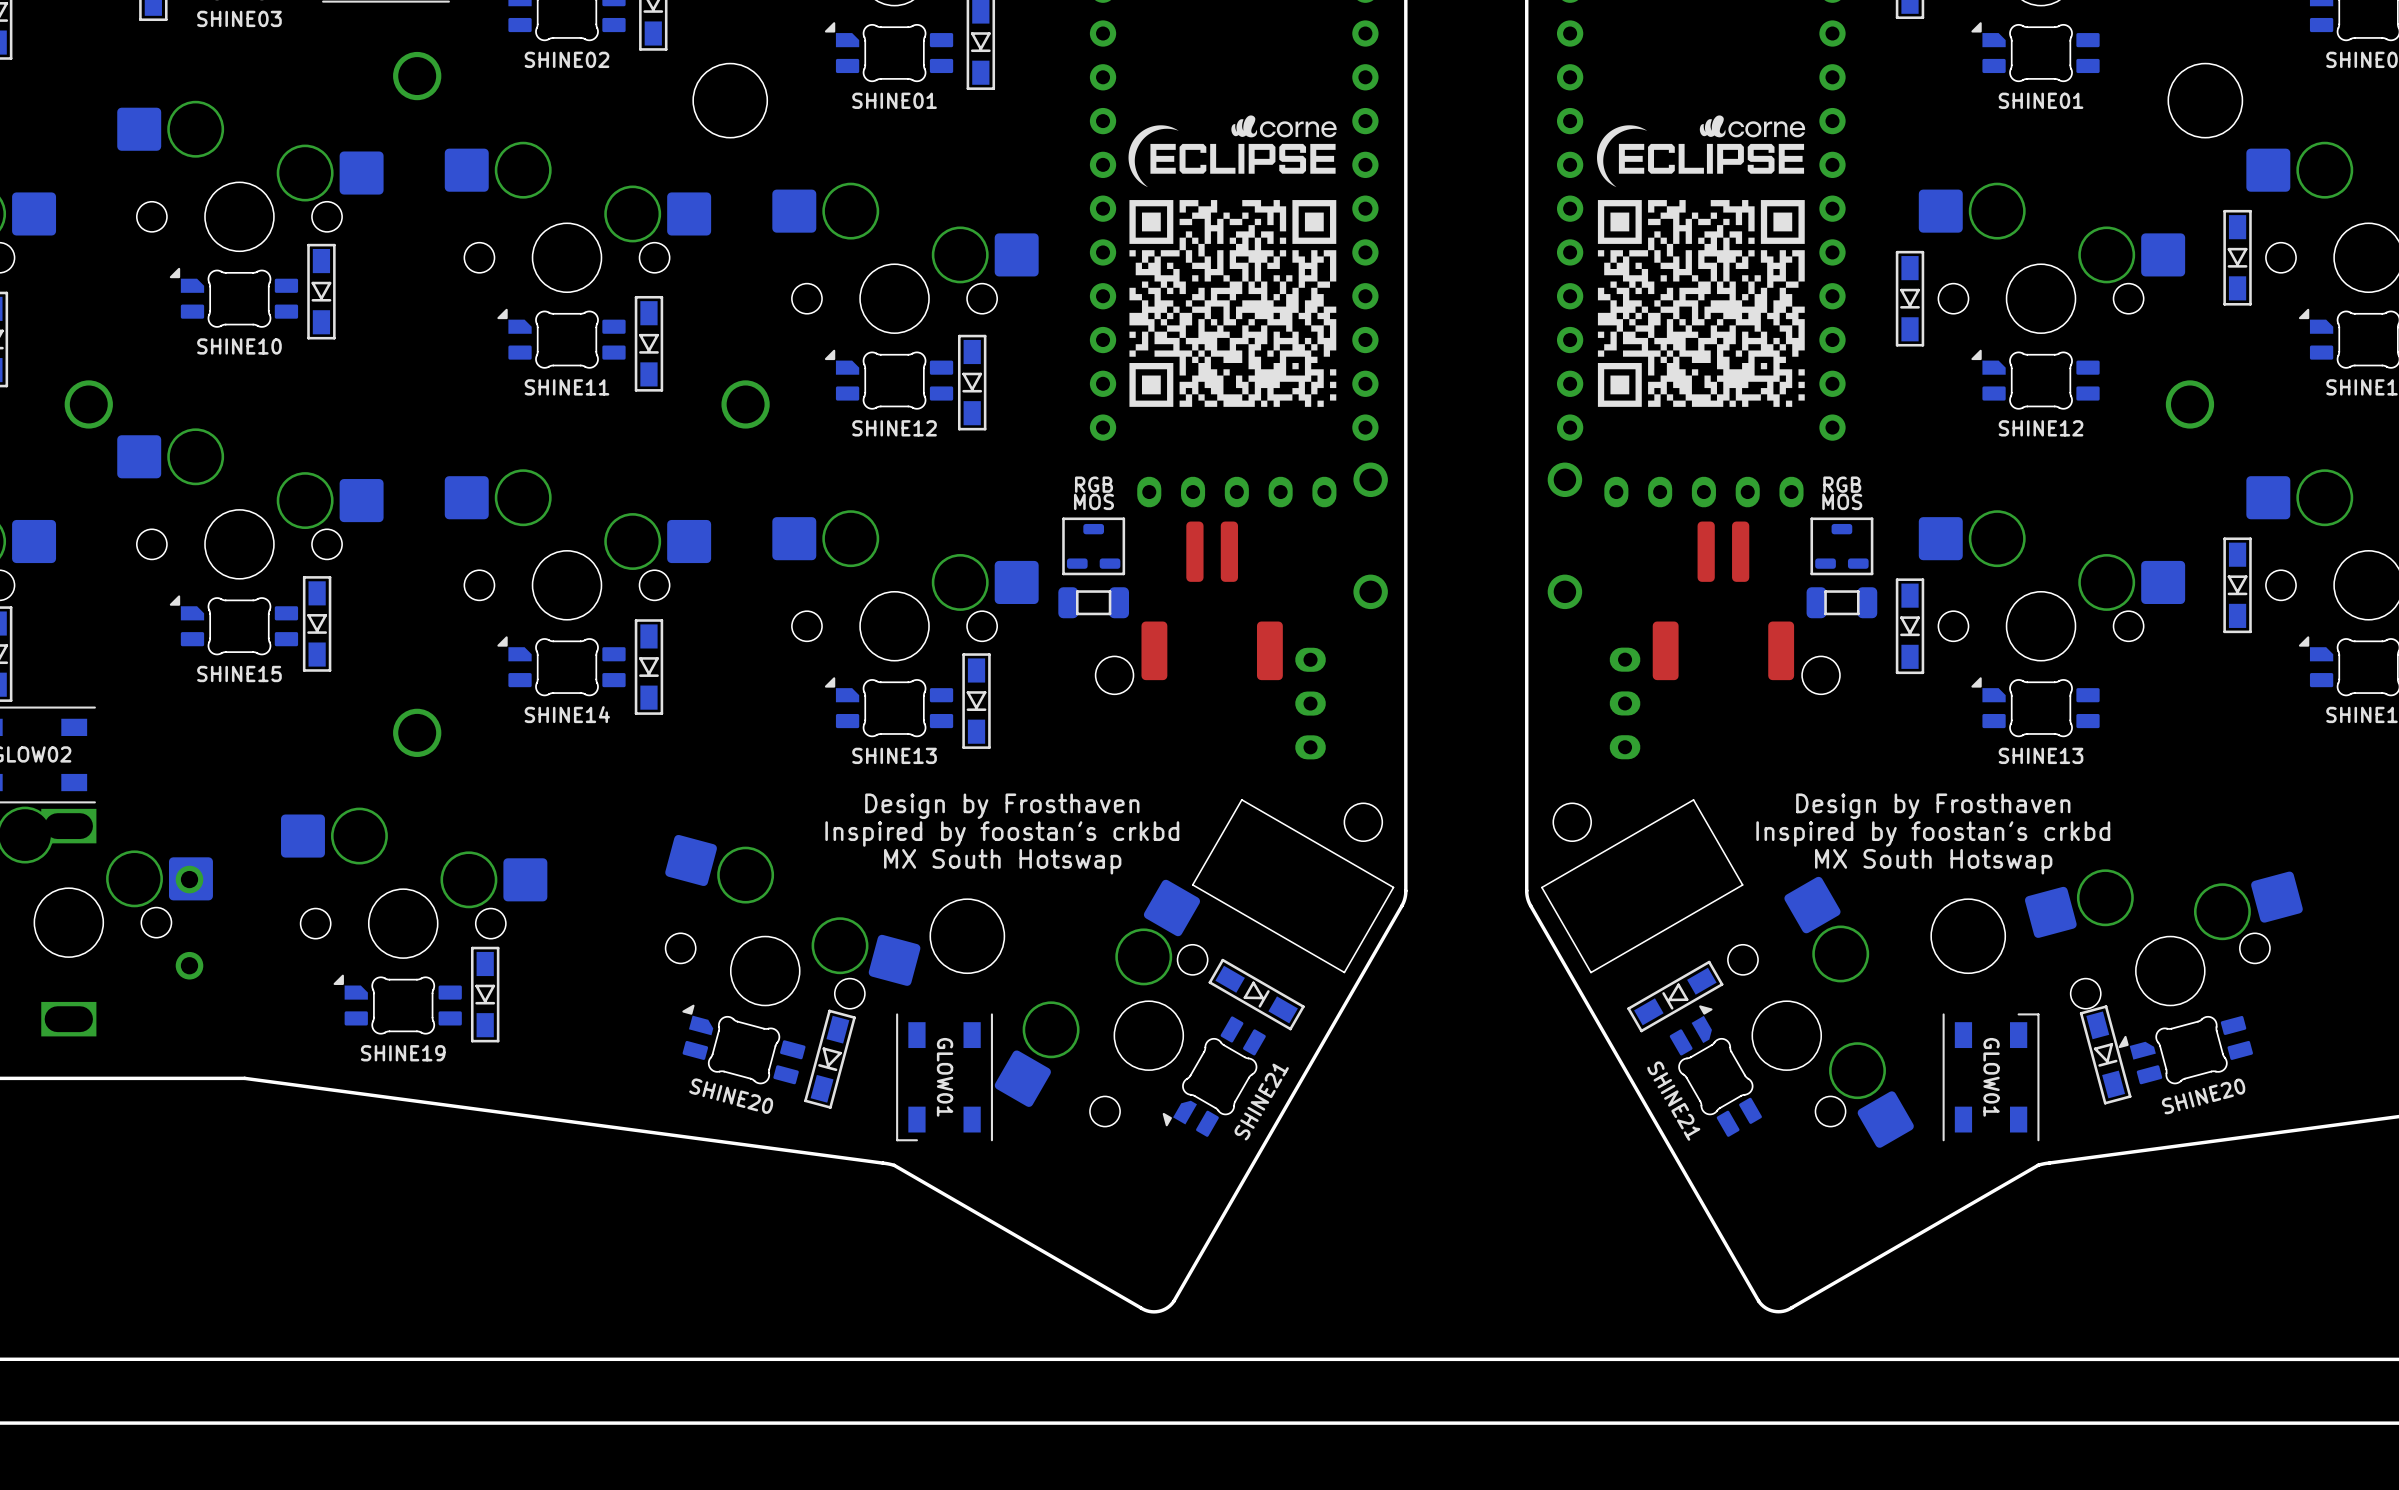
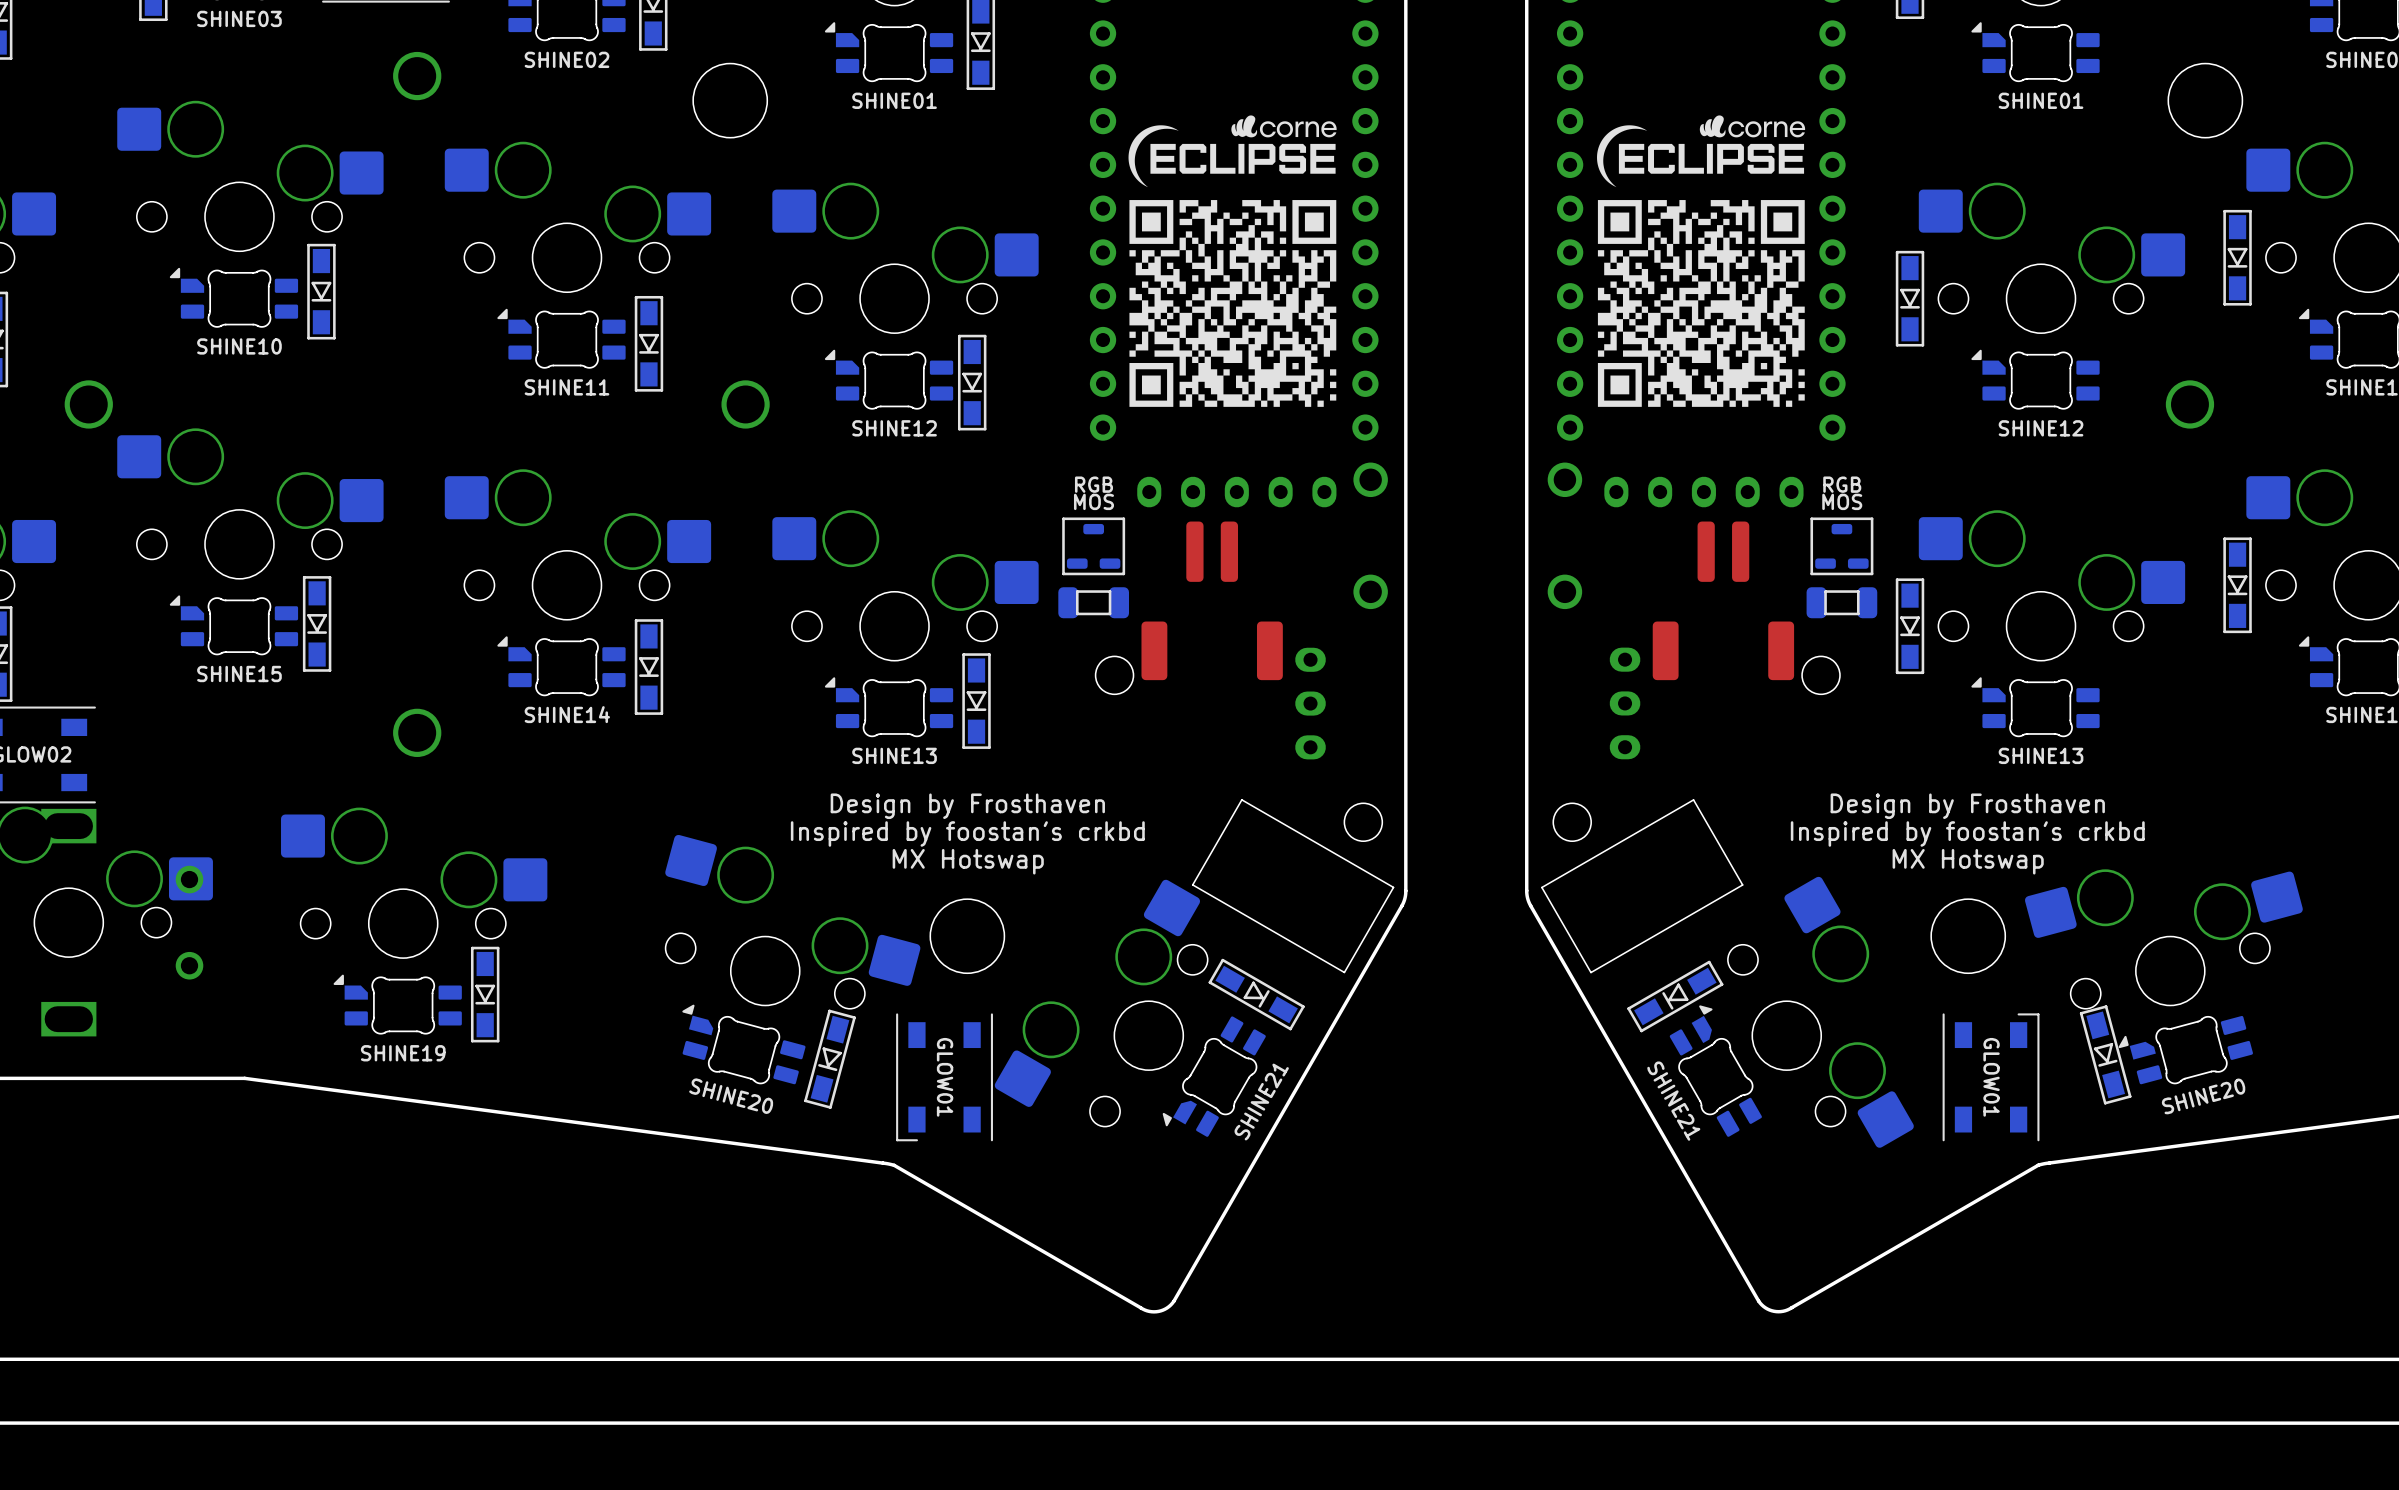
text position: Design by Frosthaven (1002, 806) -> Design by Frosthaven (967, 806)
text position: Design by Frosthaven (1933, 806) -> Design by Frosthaven (1967, 806)
text position: Inspired by foostan's crkbd (1002, 833) -> Inspired by foostan's crkbd (967, 833)
text position: Inspired by foostan's crkbd (1933, 833) -> Inspired by foostan's crkbd (1967, 833)
text: MX South Hotswap (1002, 861) -> MX Hotswap (968, 861)
text: MX South Hotswap (1933, 861) -> MX Hotswap (1968, 861)

